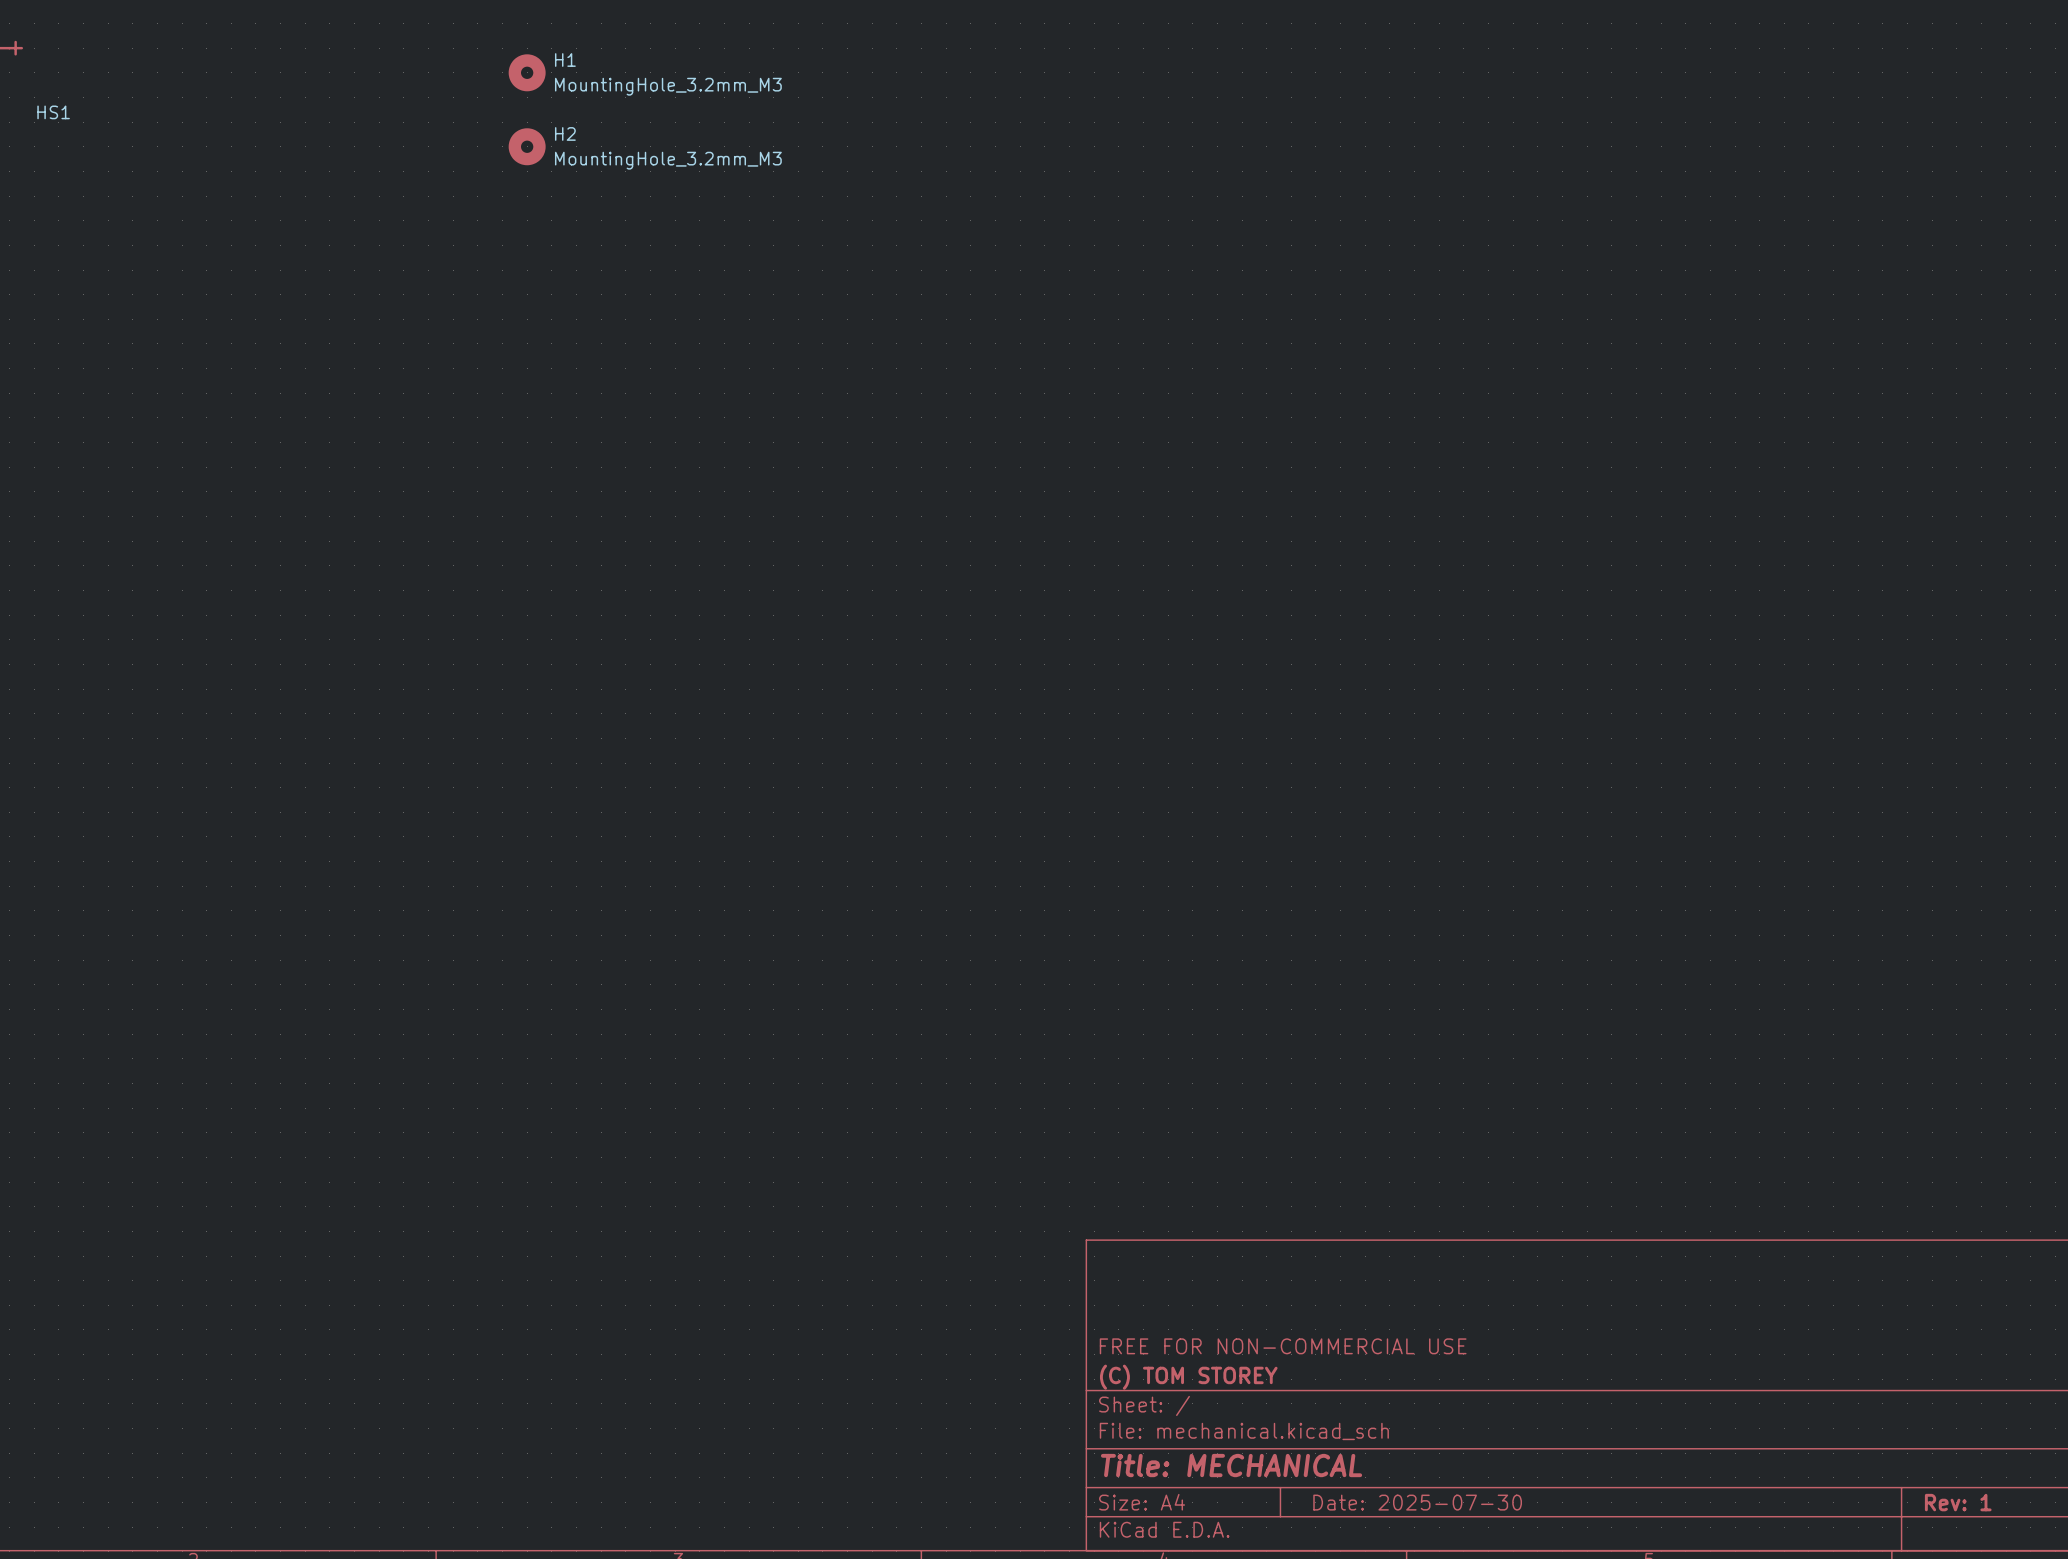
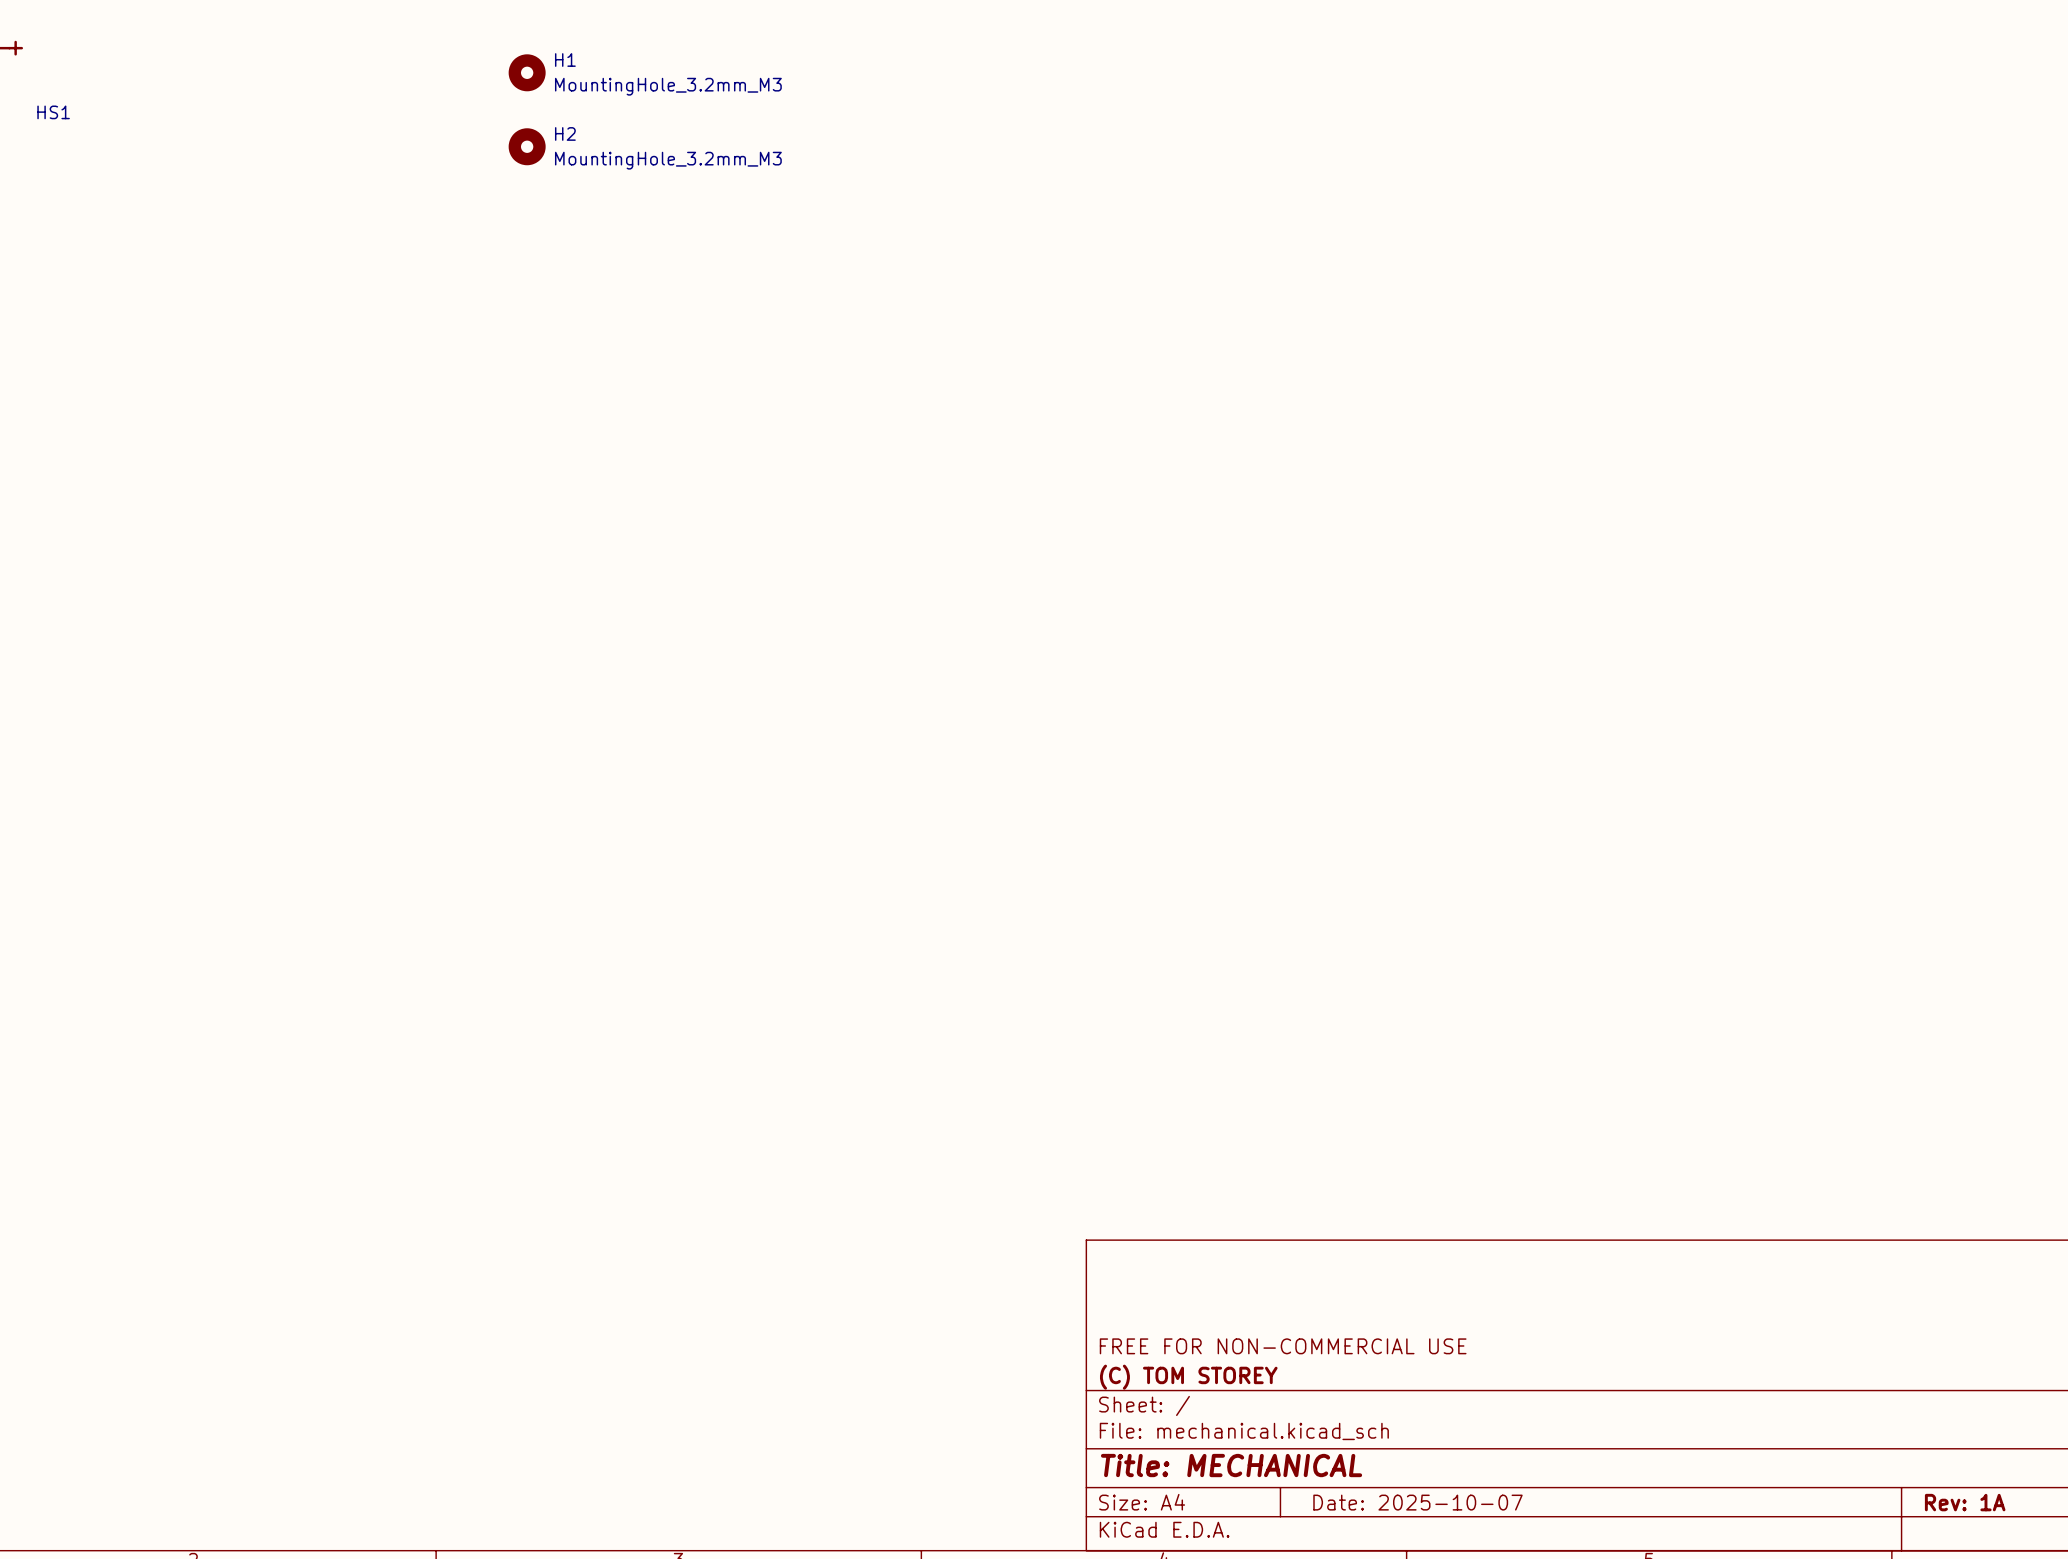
title block: Date: 2025-07-30 (1417, 1502) -> Date: 2025-10-07 (1417, 1502)
title block: Rev: 1 (1958, 1502) -> Rev: 1A (1965, 1502)

